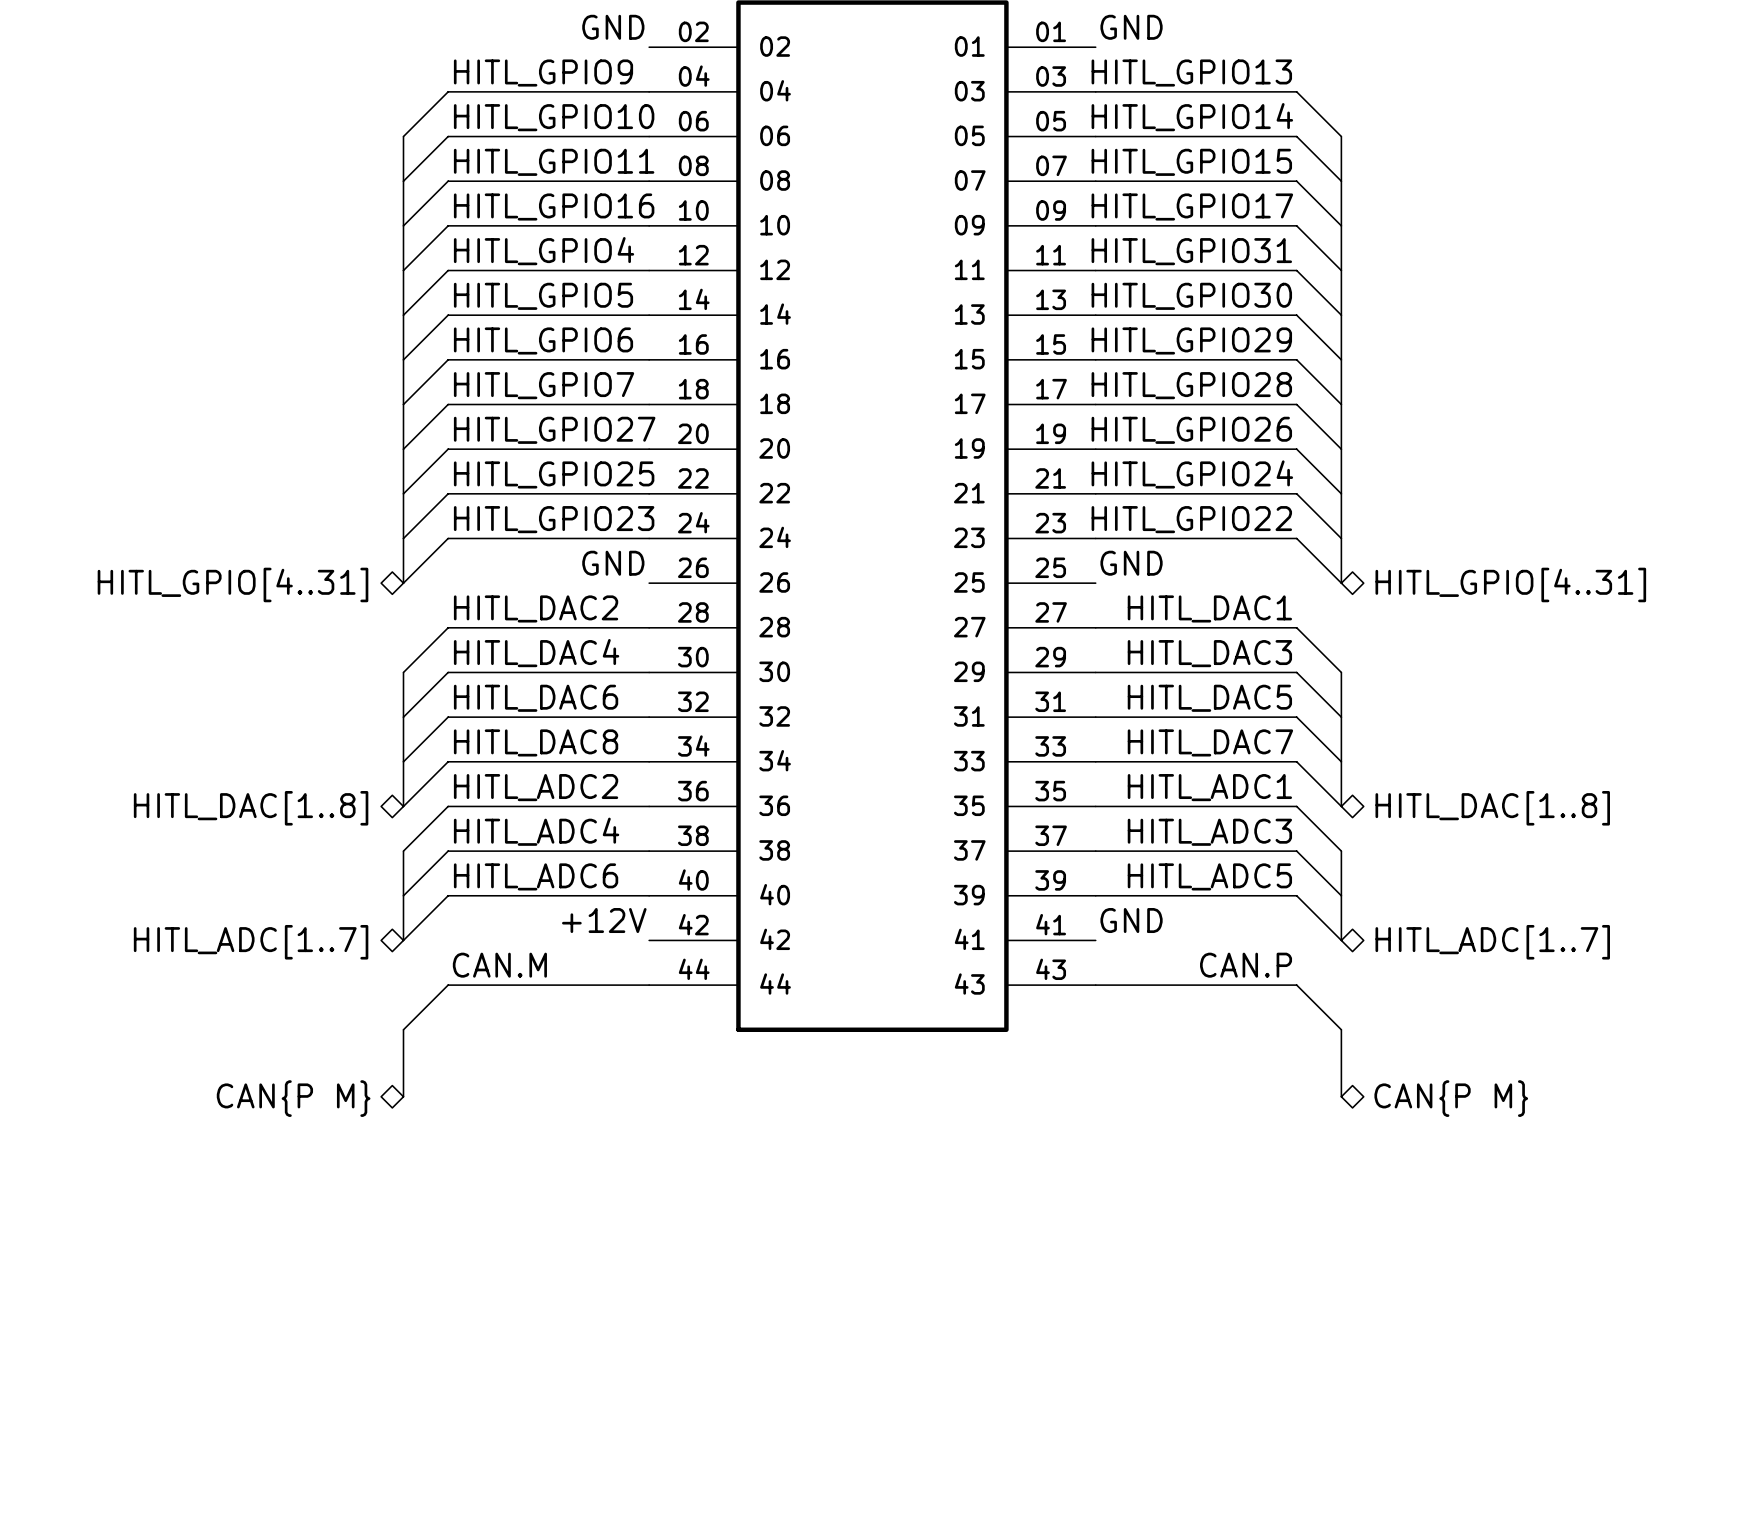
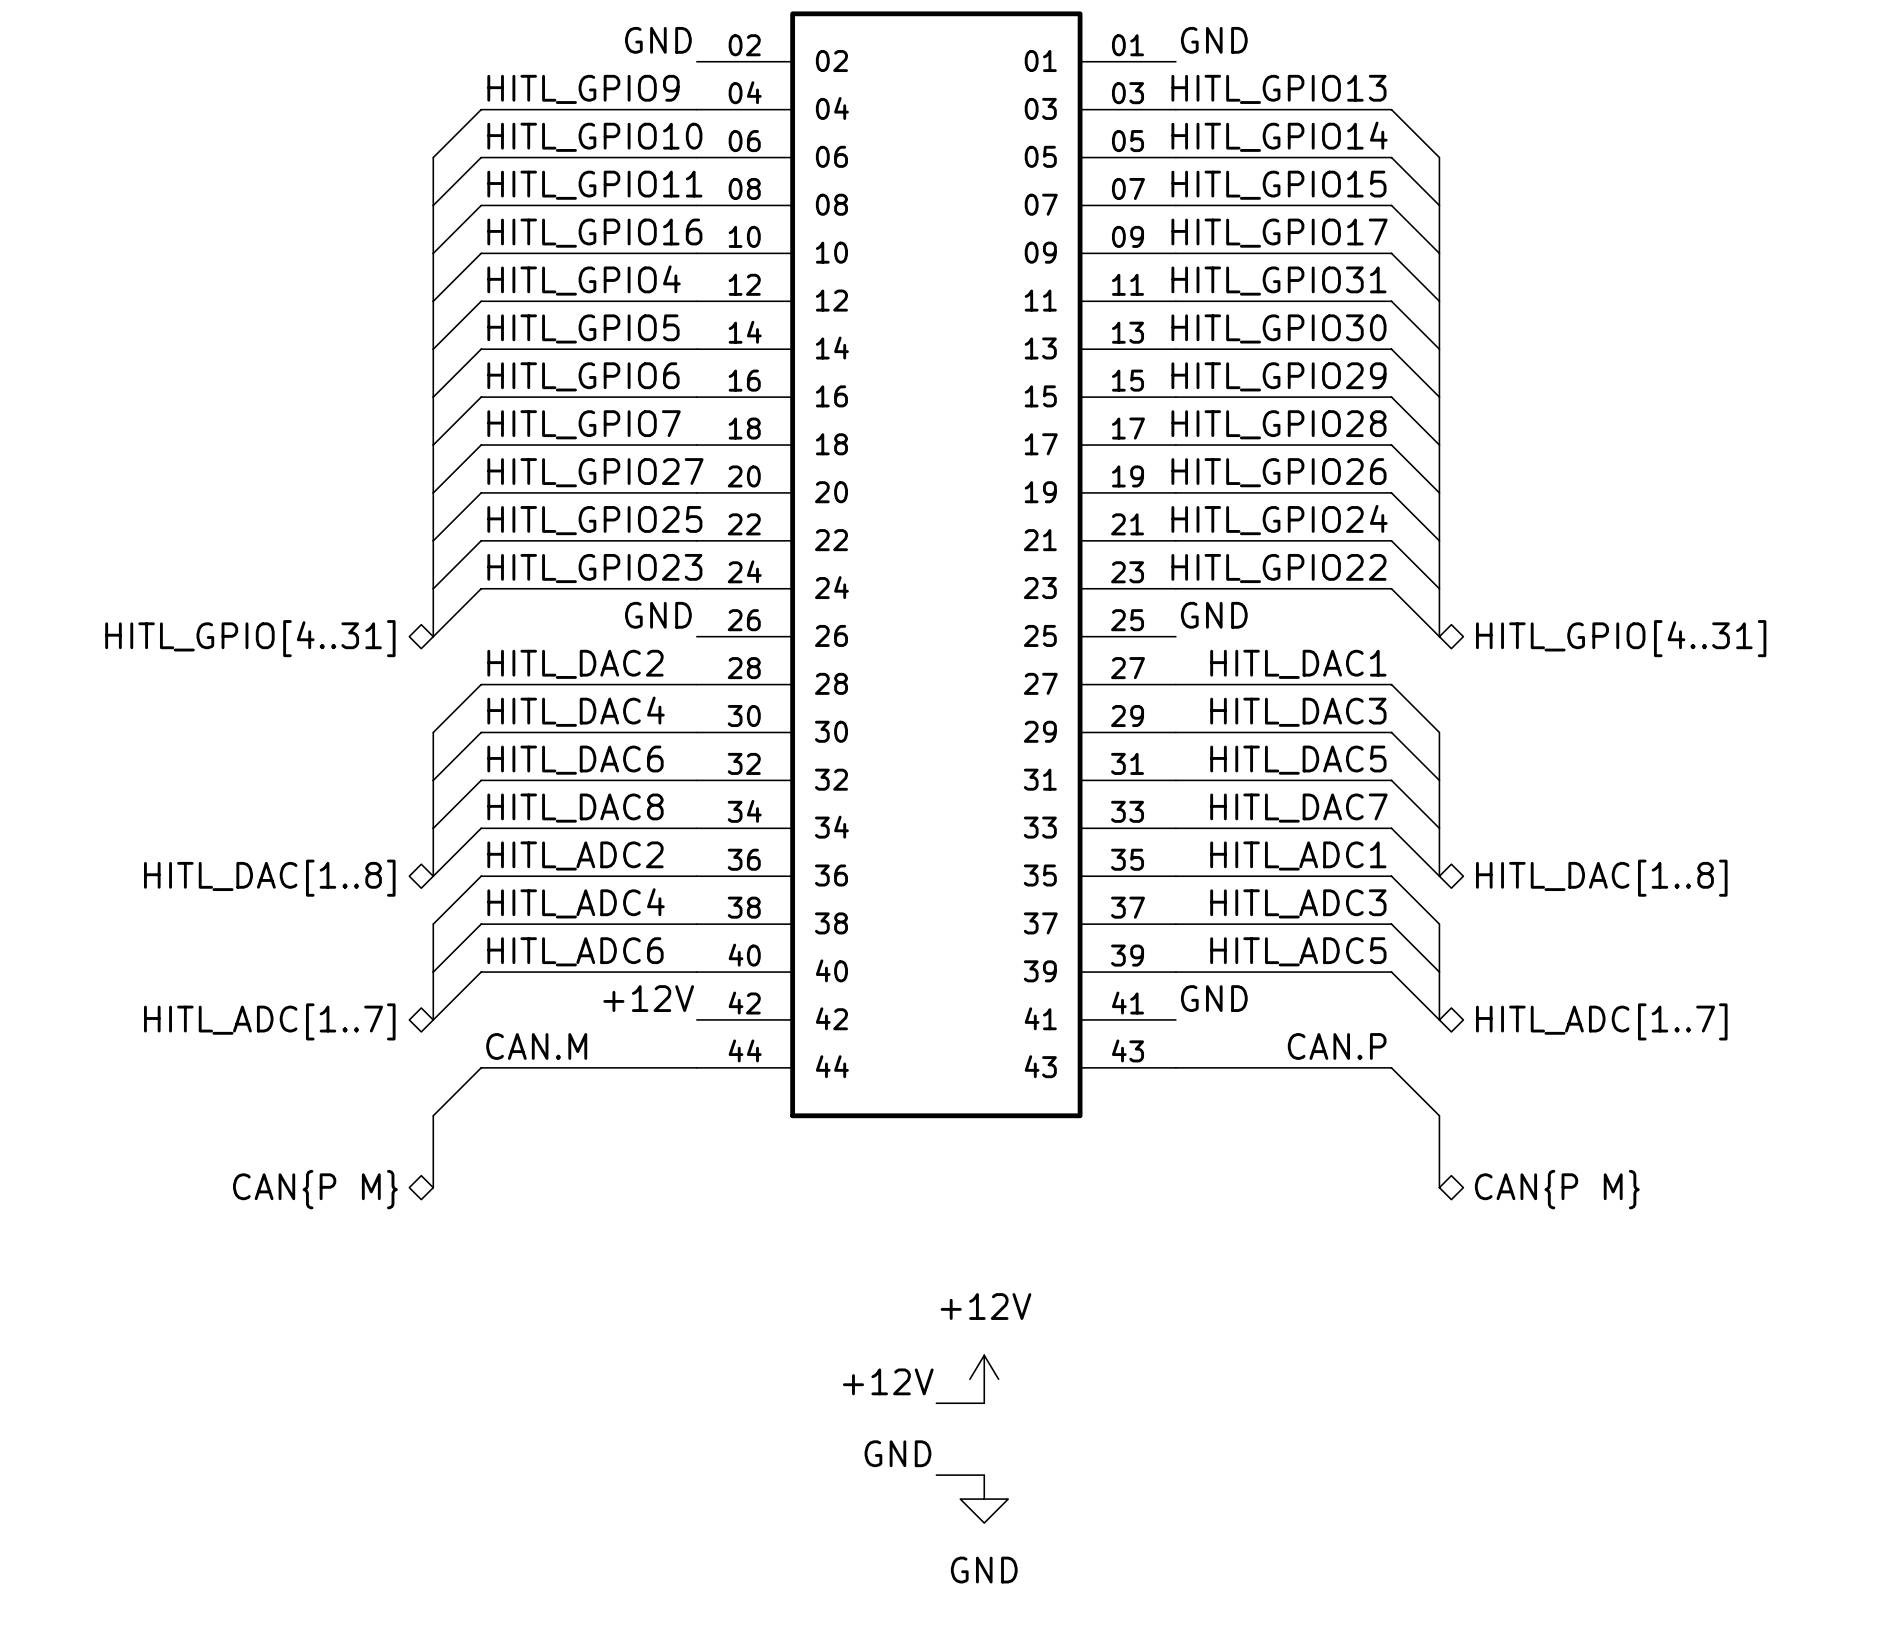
power symbol: none -> +12V (984, 1379)
label: none -> +12V (888, 1381)
wire: none -> (936, 1403) (984, 1403)
label: none -> GND (897, 1453)
wire: none -> (936, 1475) (984, 1475)
power symbol: none -> GND (984, 1499)

